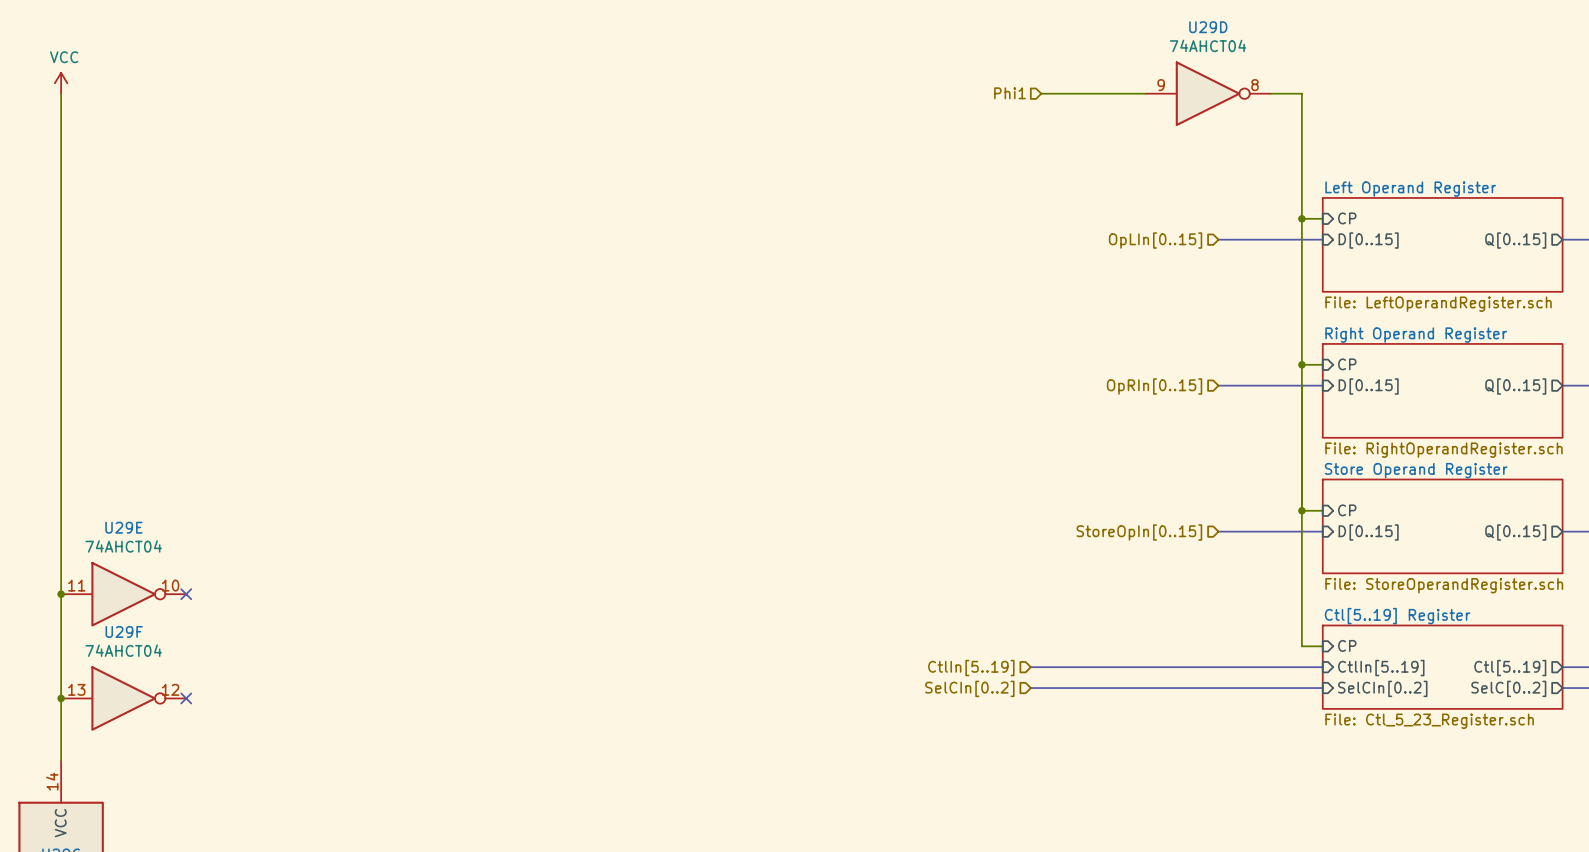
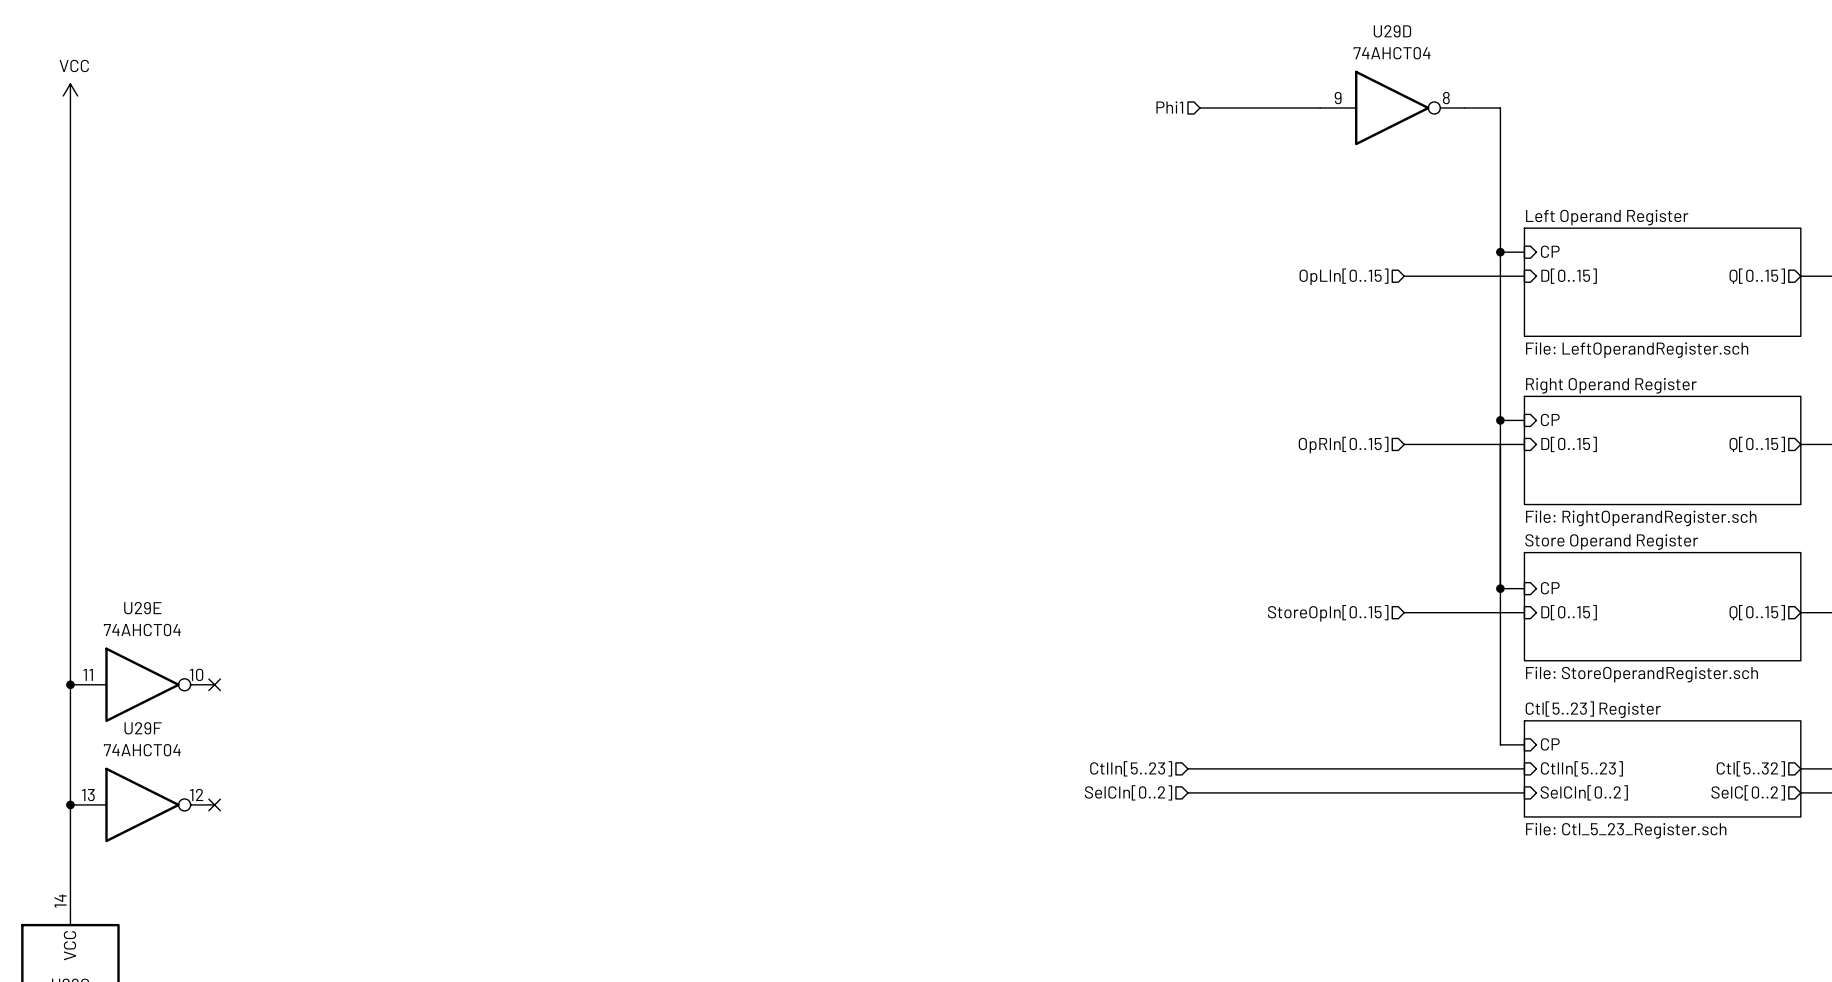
sheet Ctl[5..19] Register name: Ctl[5..19] Register (1397, 616) -> Ctl[5..23] Register (1593, 709)
hierarchical label: CtlIn[5..19] (971, 668) -> CtlIn[5..23] (1131, 768)
sheet pin: CtlIn[5..19] (1381, 668) -> CtlIn[5..23] (1581, 768)
sheet pin: Ctl[5..19] (1510, 668) -> Ctl[5..32] (1750, 768)

